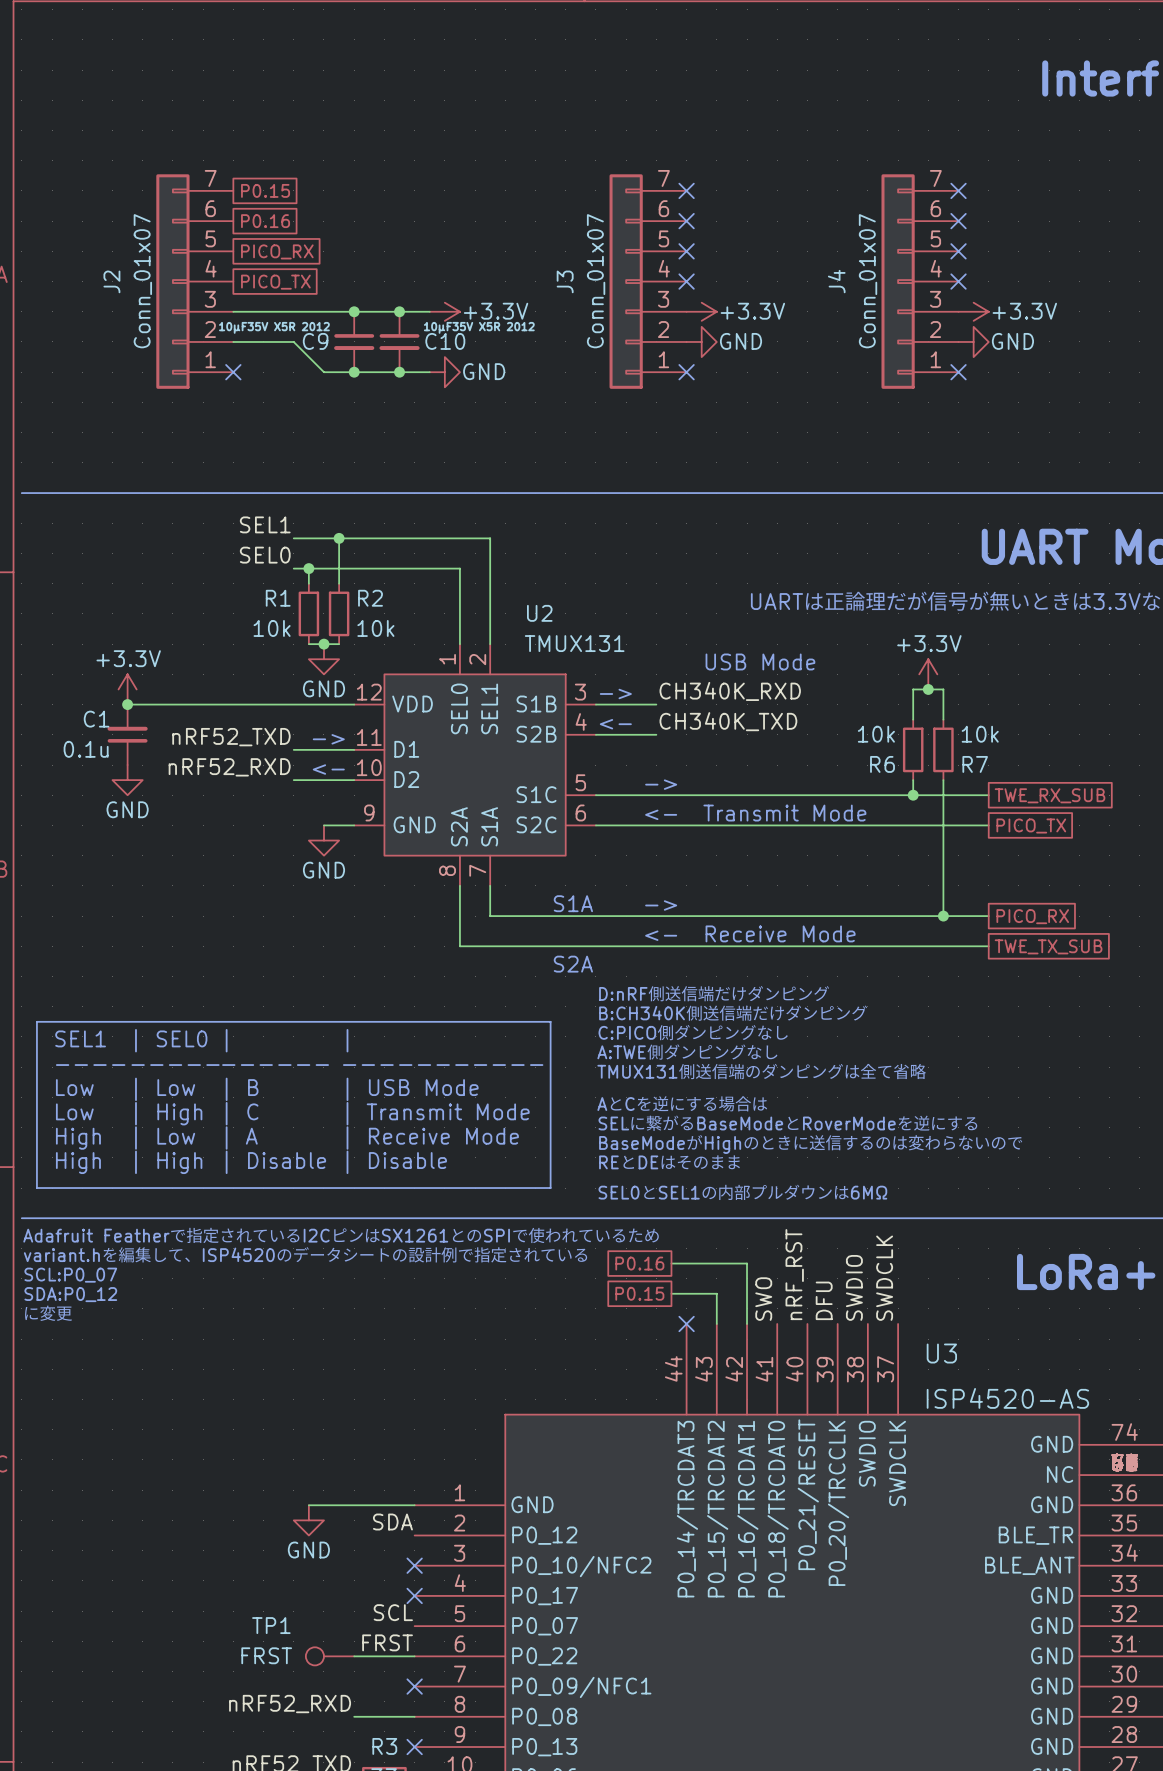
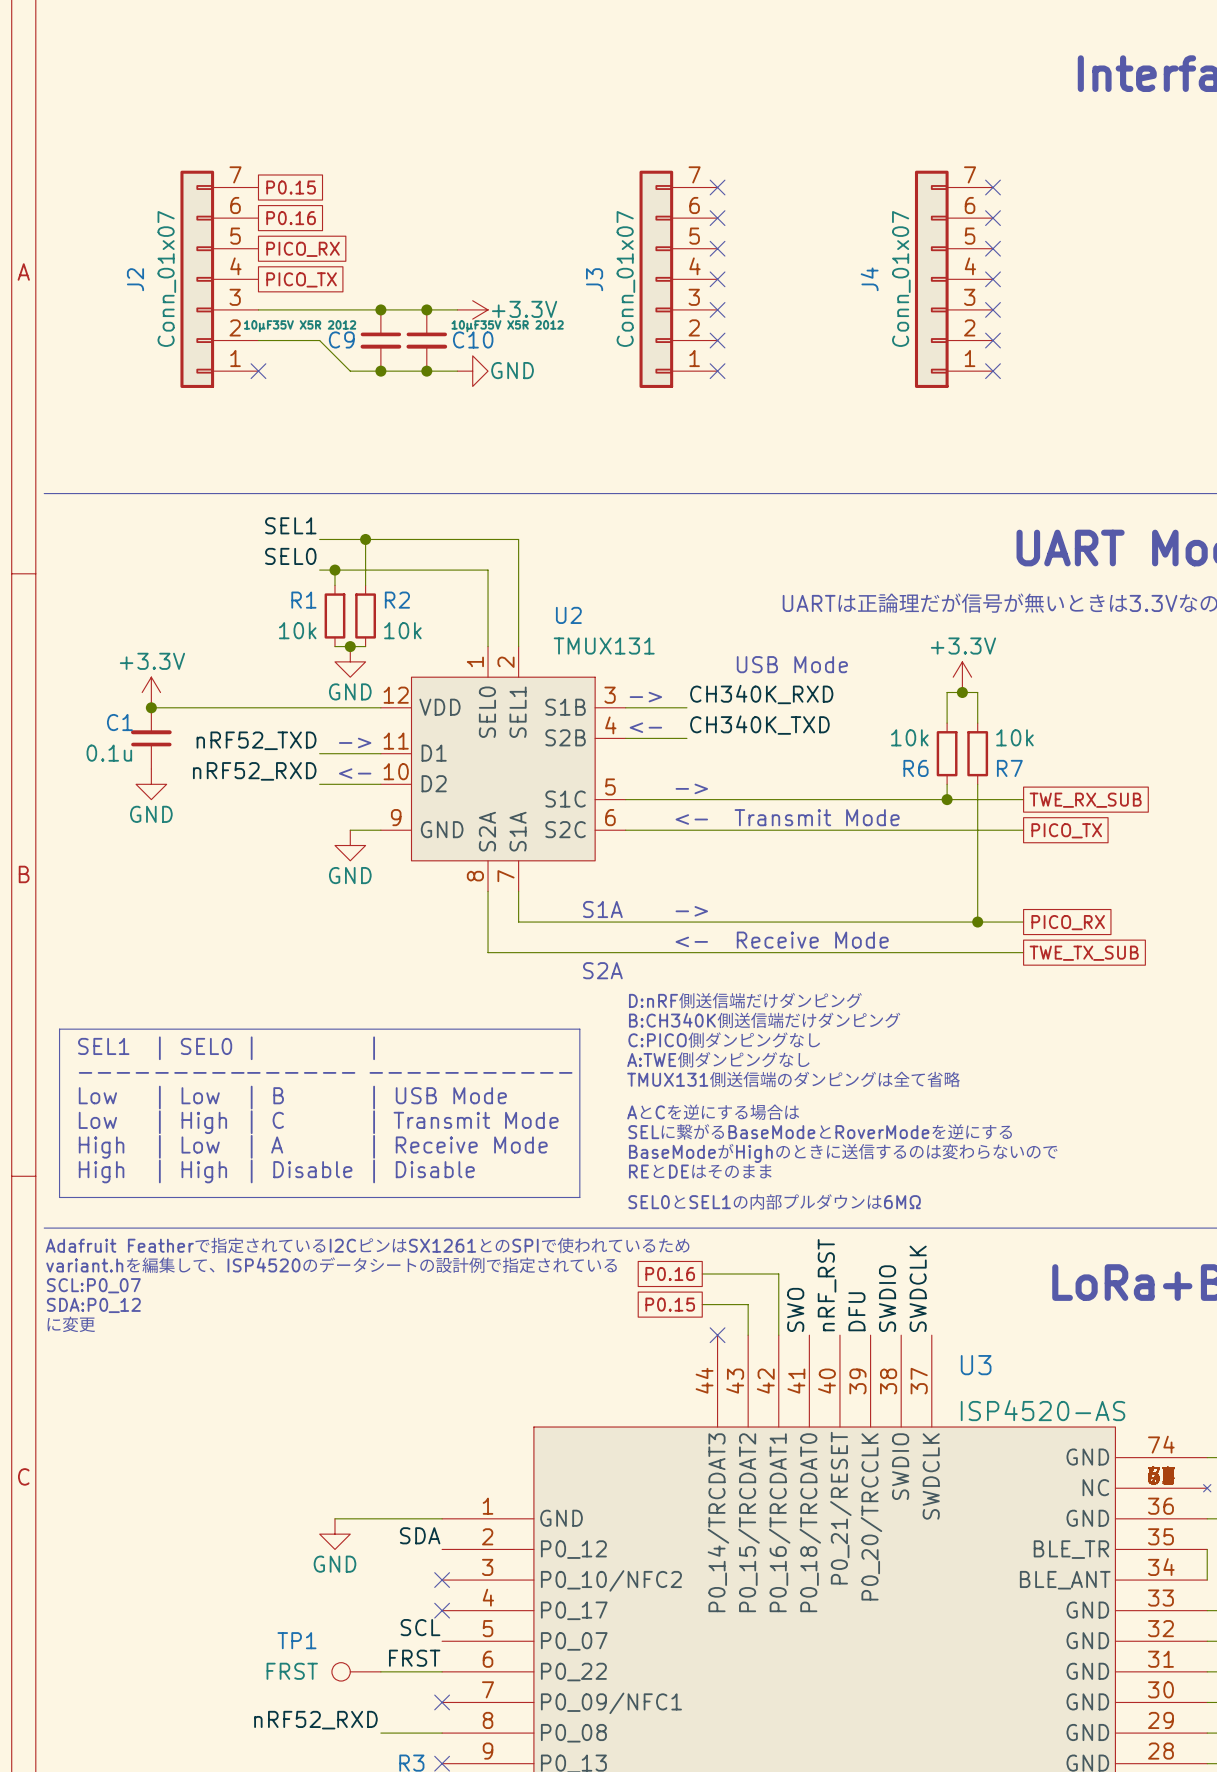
no-connect mark: none -> (717, 309)
power symbol: +3.3V (701, 311) -> none
no-connect mark: none -> (993, 309)
power symbol: +3.3V (973, 311) -> none
no-connect mark: none -> (717, 340)
power symbol: GND (701, 341) -> none
no-connect mark: none -> (993, 340)
power symbol: GND (973, 341) -> none

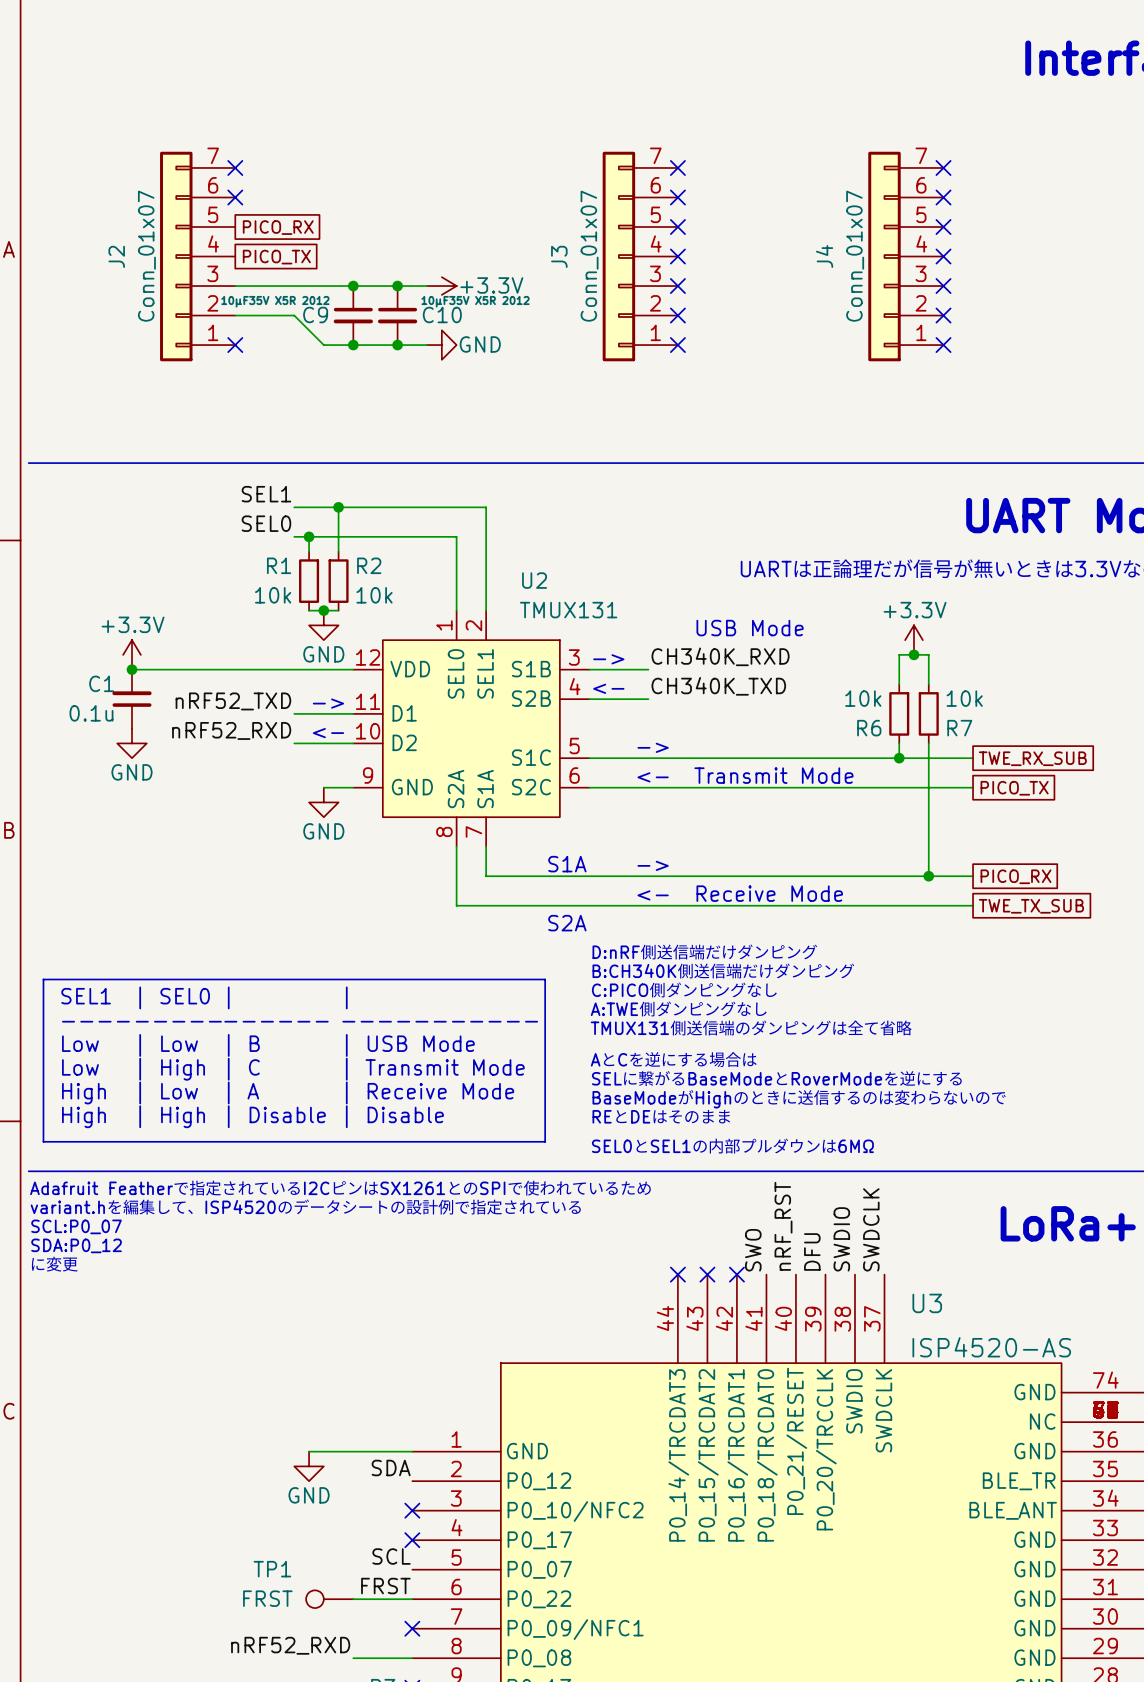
no-connect mark: none -> (235, 167)
global label: P0.15 (291, 187) -> none
no-connect mark: none -> (235, 197)
global label: P0.16 (291, 218) -> none
global label: P0.16 (670, 1273) -> none
wire: (702, 1273) (778, 1273) (778, 1335) -> none
global label: P0.15 (670, 1304) -> none
wire: (702, 1304) (748, 1304) (748, 1335) -> none
no-connect mark: none -> (707, 1274)
no-connect mark: none -> (736, 1274)

